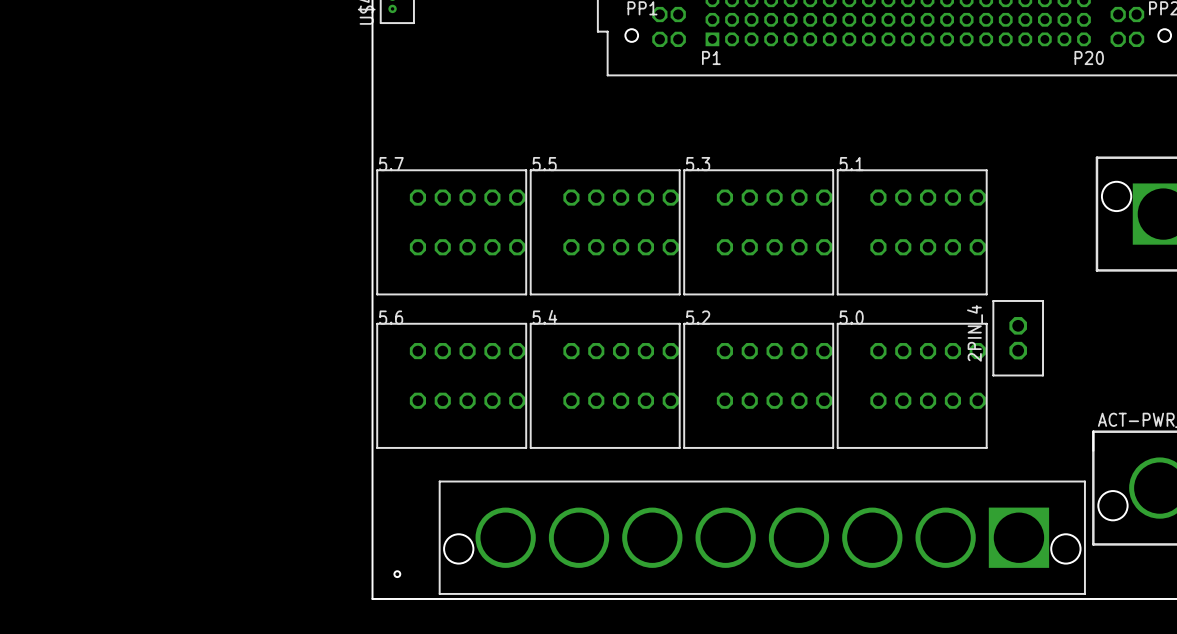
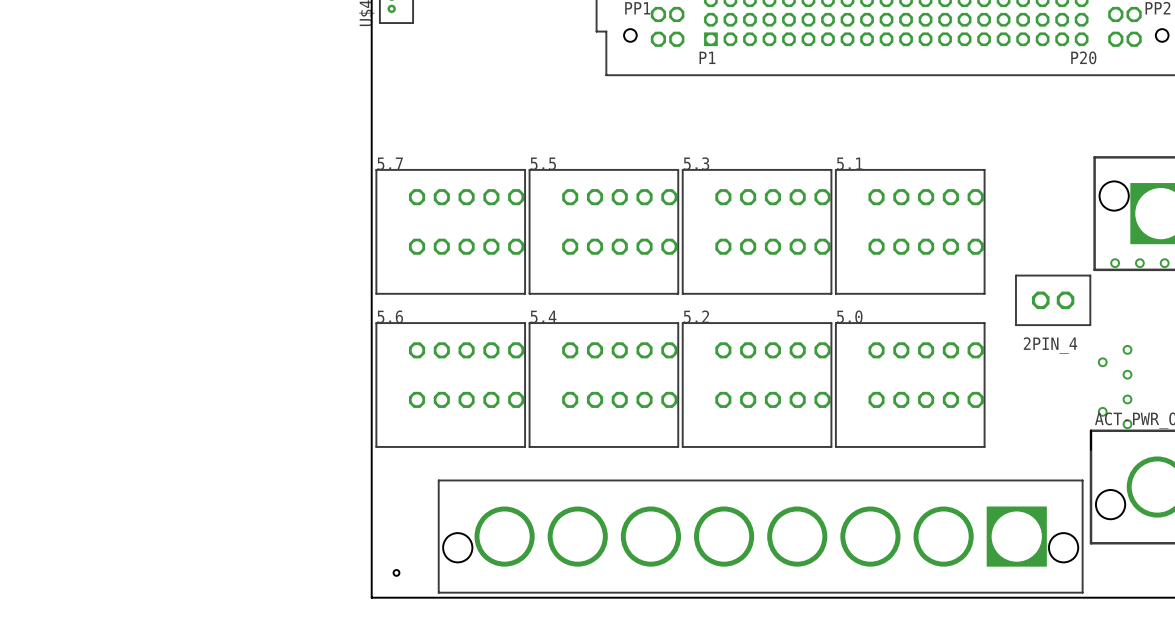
via: none -> (1115, 263)
via: none -> (1139, 263)
via: none -> (1164, 263)
2PIN_4 name position: 2PIN_4 (975, 333) -> 2PIN_4 (1050, 345)
2PIN_4 rotation: 0° (1018, 338) -> 90° clockwise (1053, 300)
2PIN_4 position: (1018, 338) -> (1053, 300)
via: none -> (1127, 349)
via: none -> (1102, 362)
via: none -> (1127, 374)
via: none -> (1127, 399)
via: none -> (1102, 411)
via: none -> (1127, 424)

